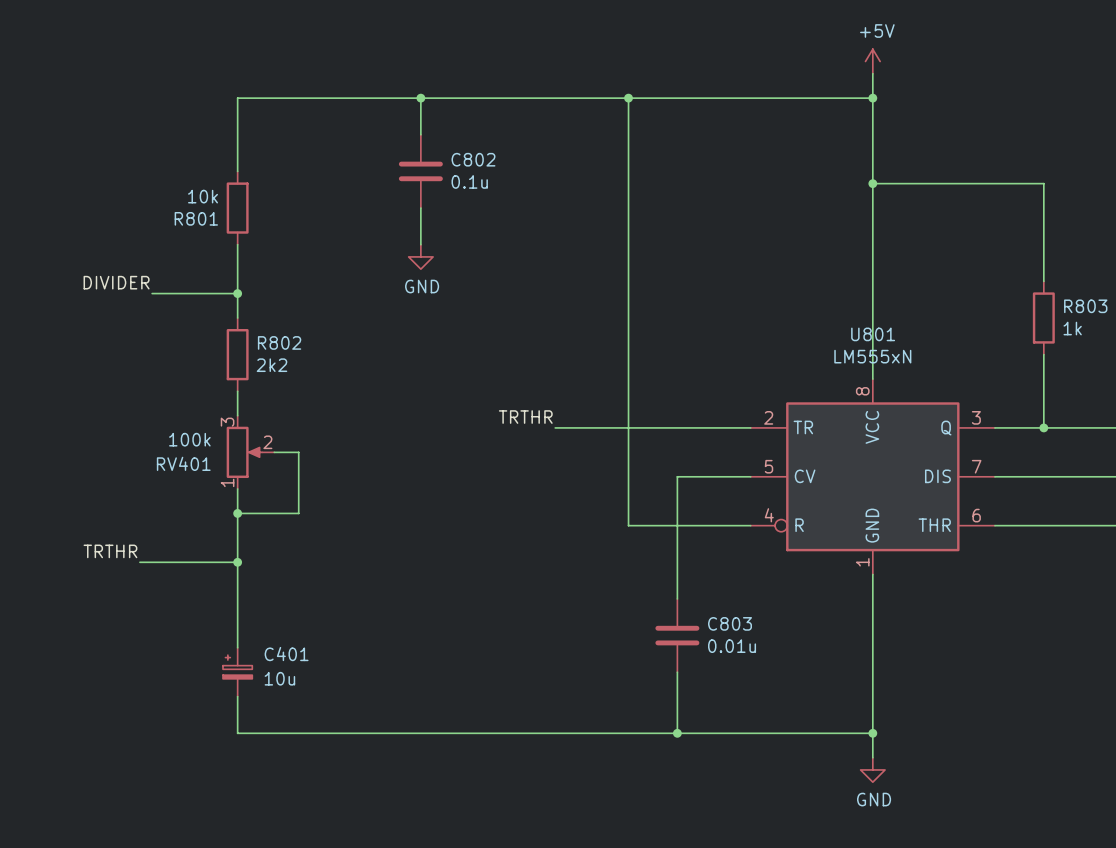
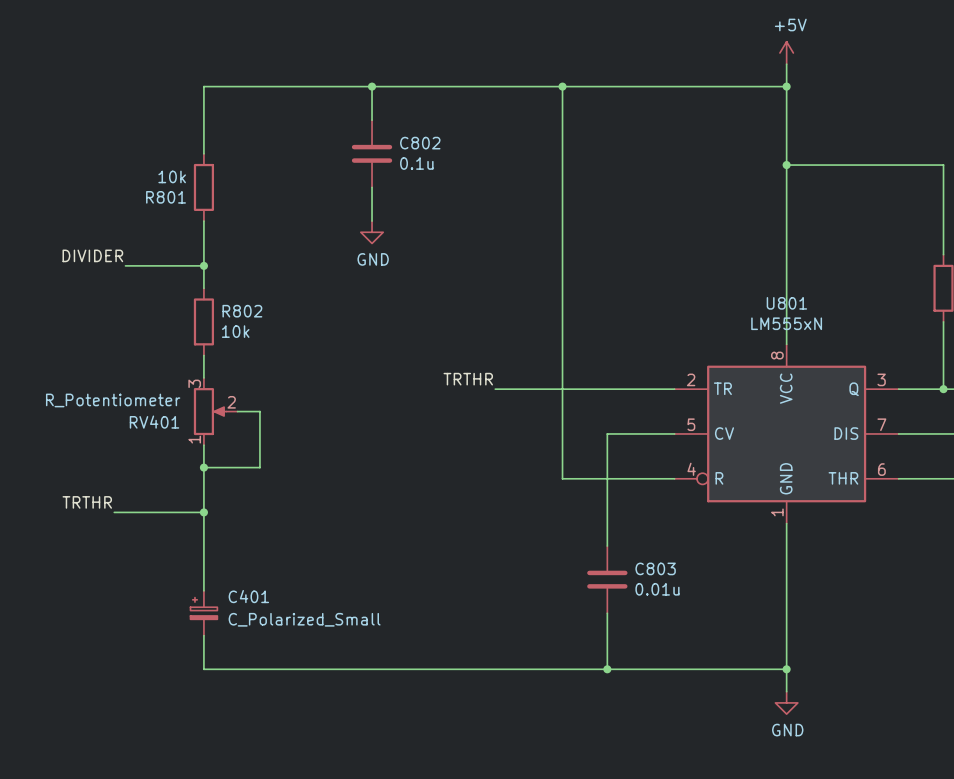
R802 value: 2k2 (272, 365) -> 10k (235, 331)
RV401 value: 100k (189, 439) -> R_Potentiometer (113, 400)
C401 value: 10u (279, 678) -> C_Polarized_Small (304, 619)

